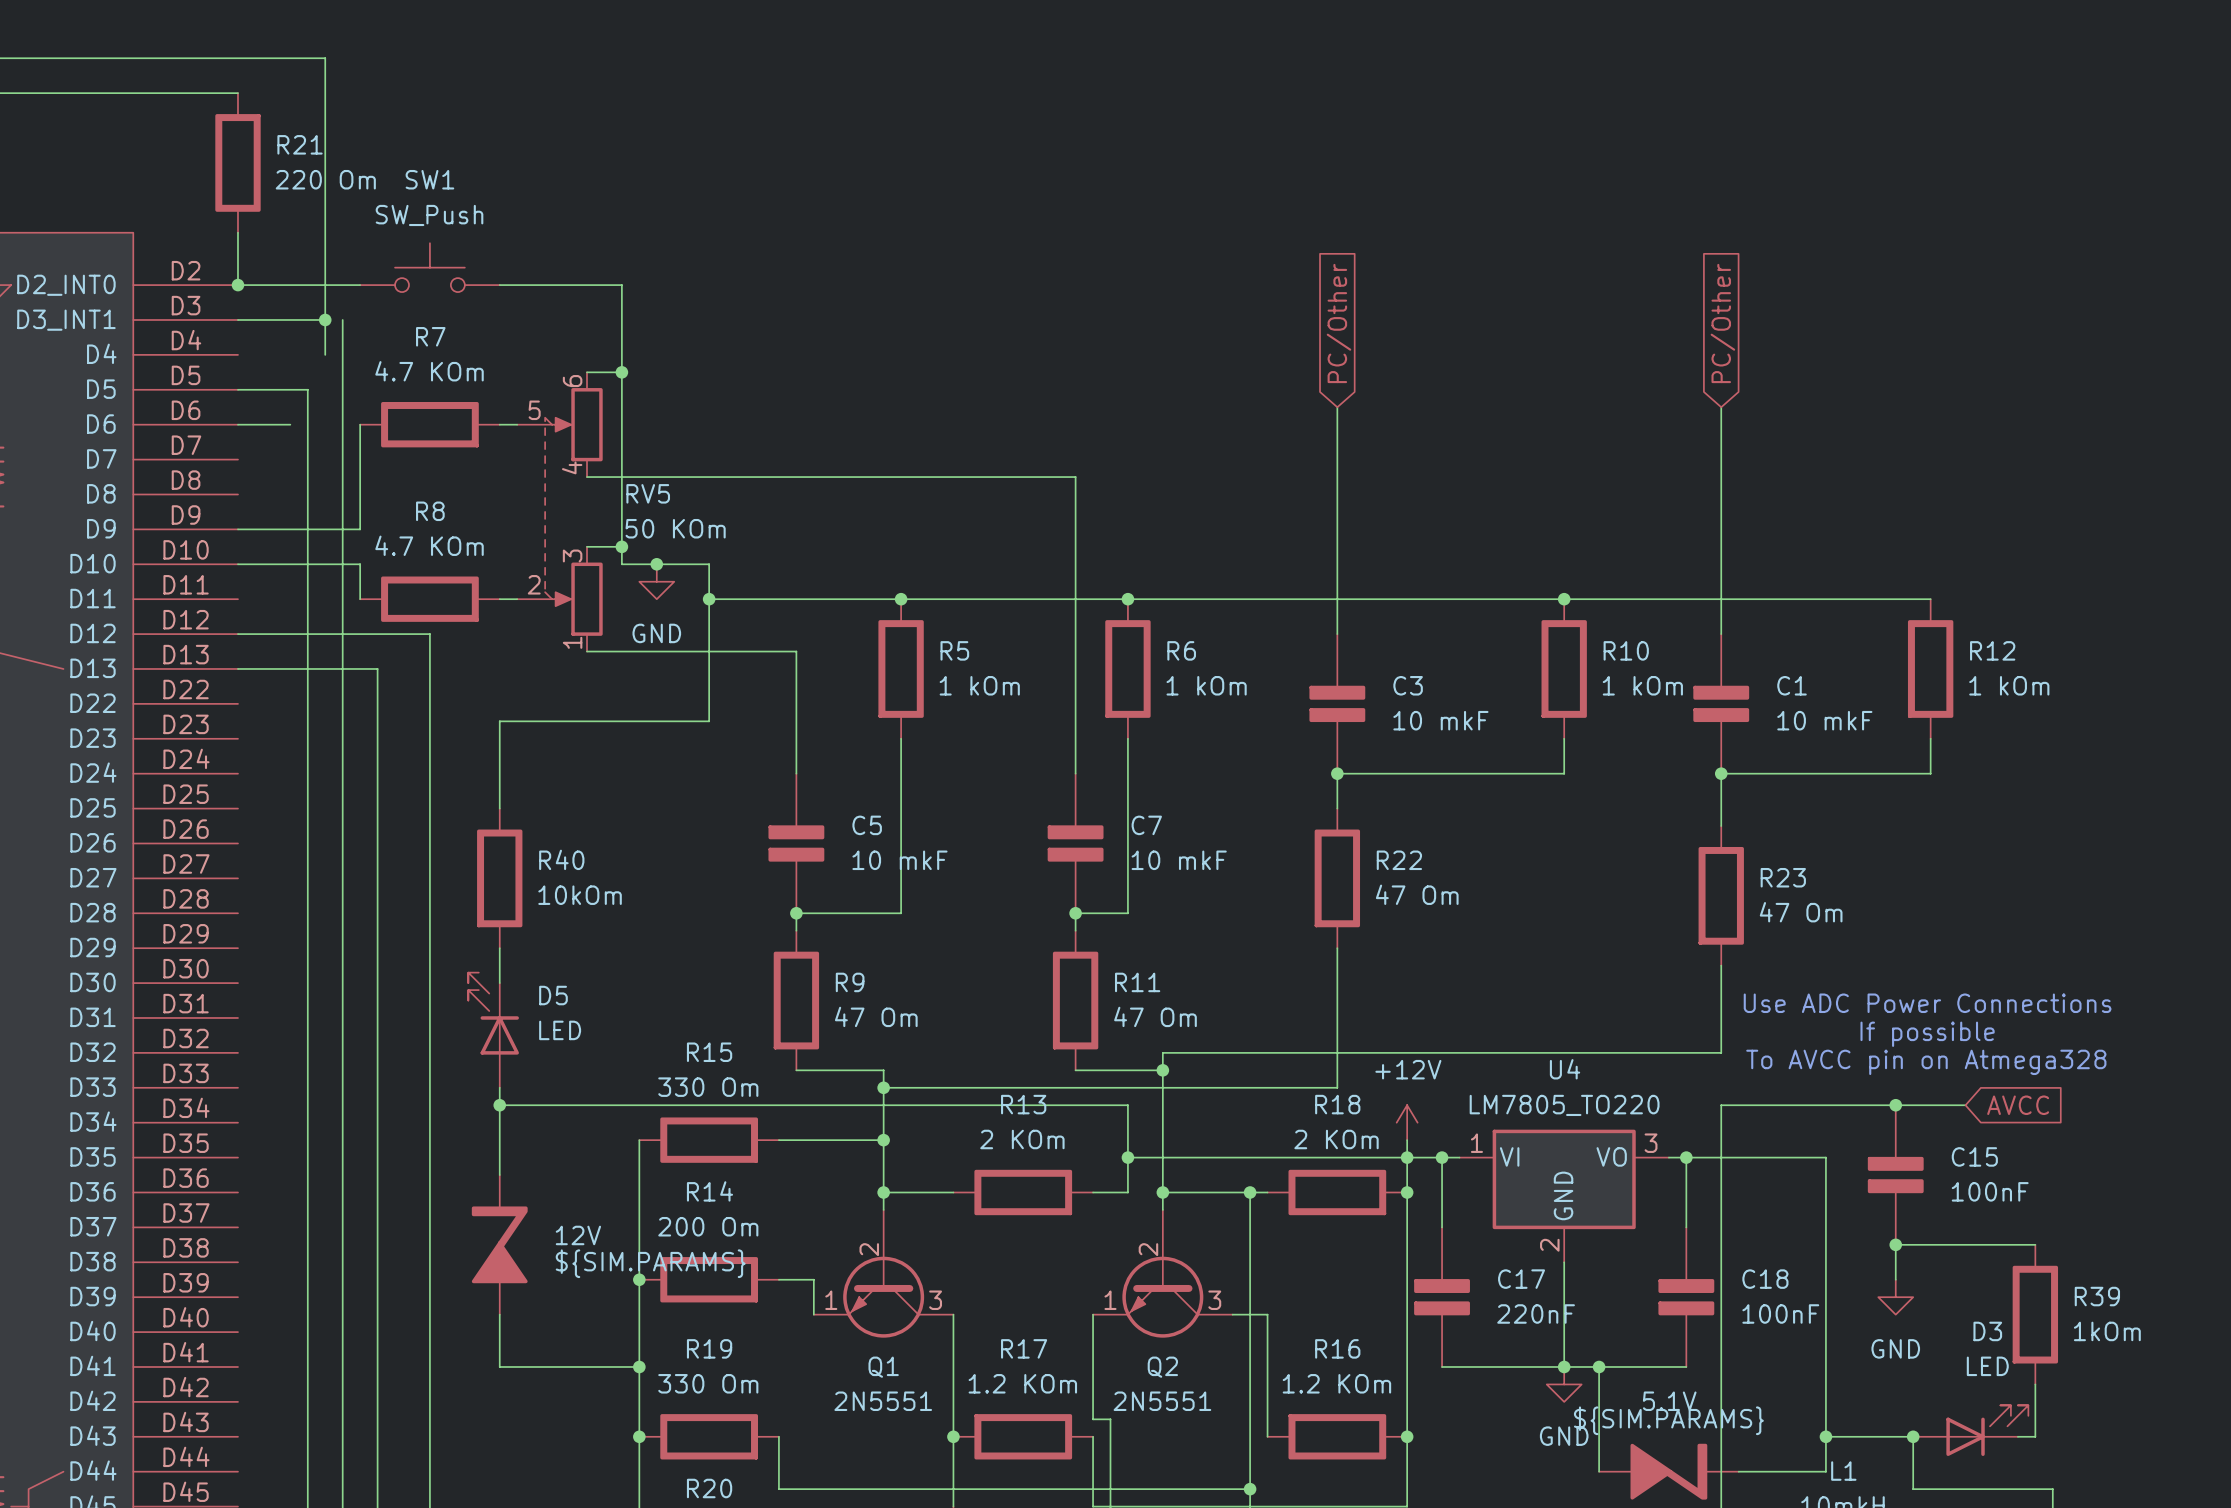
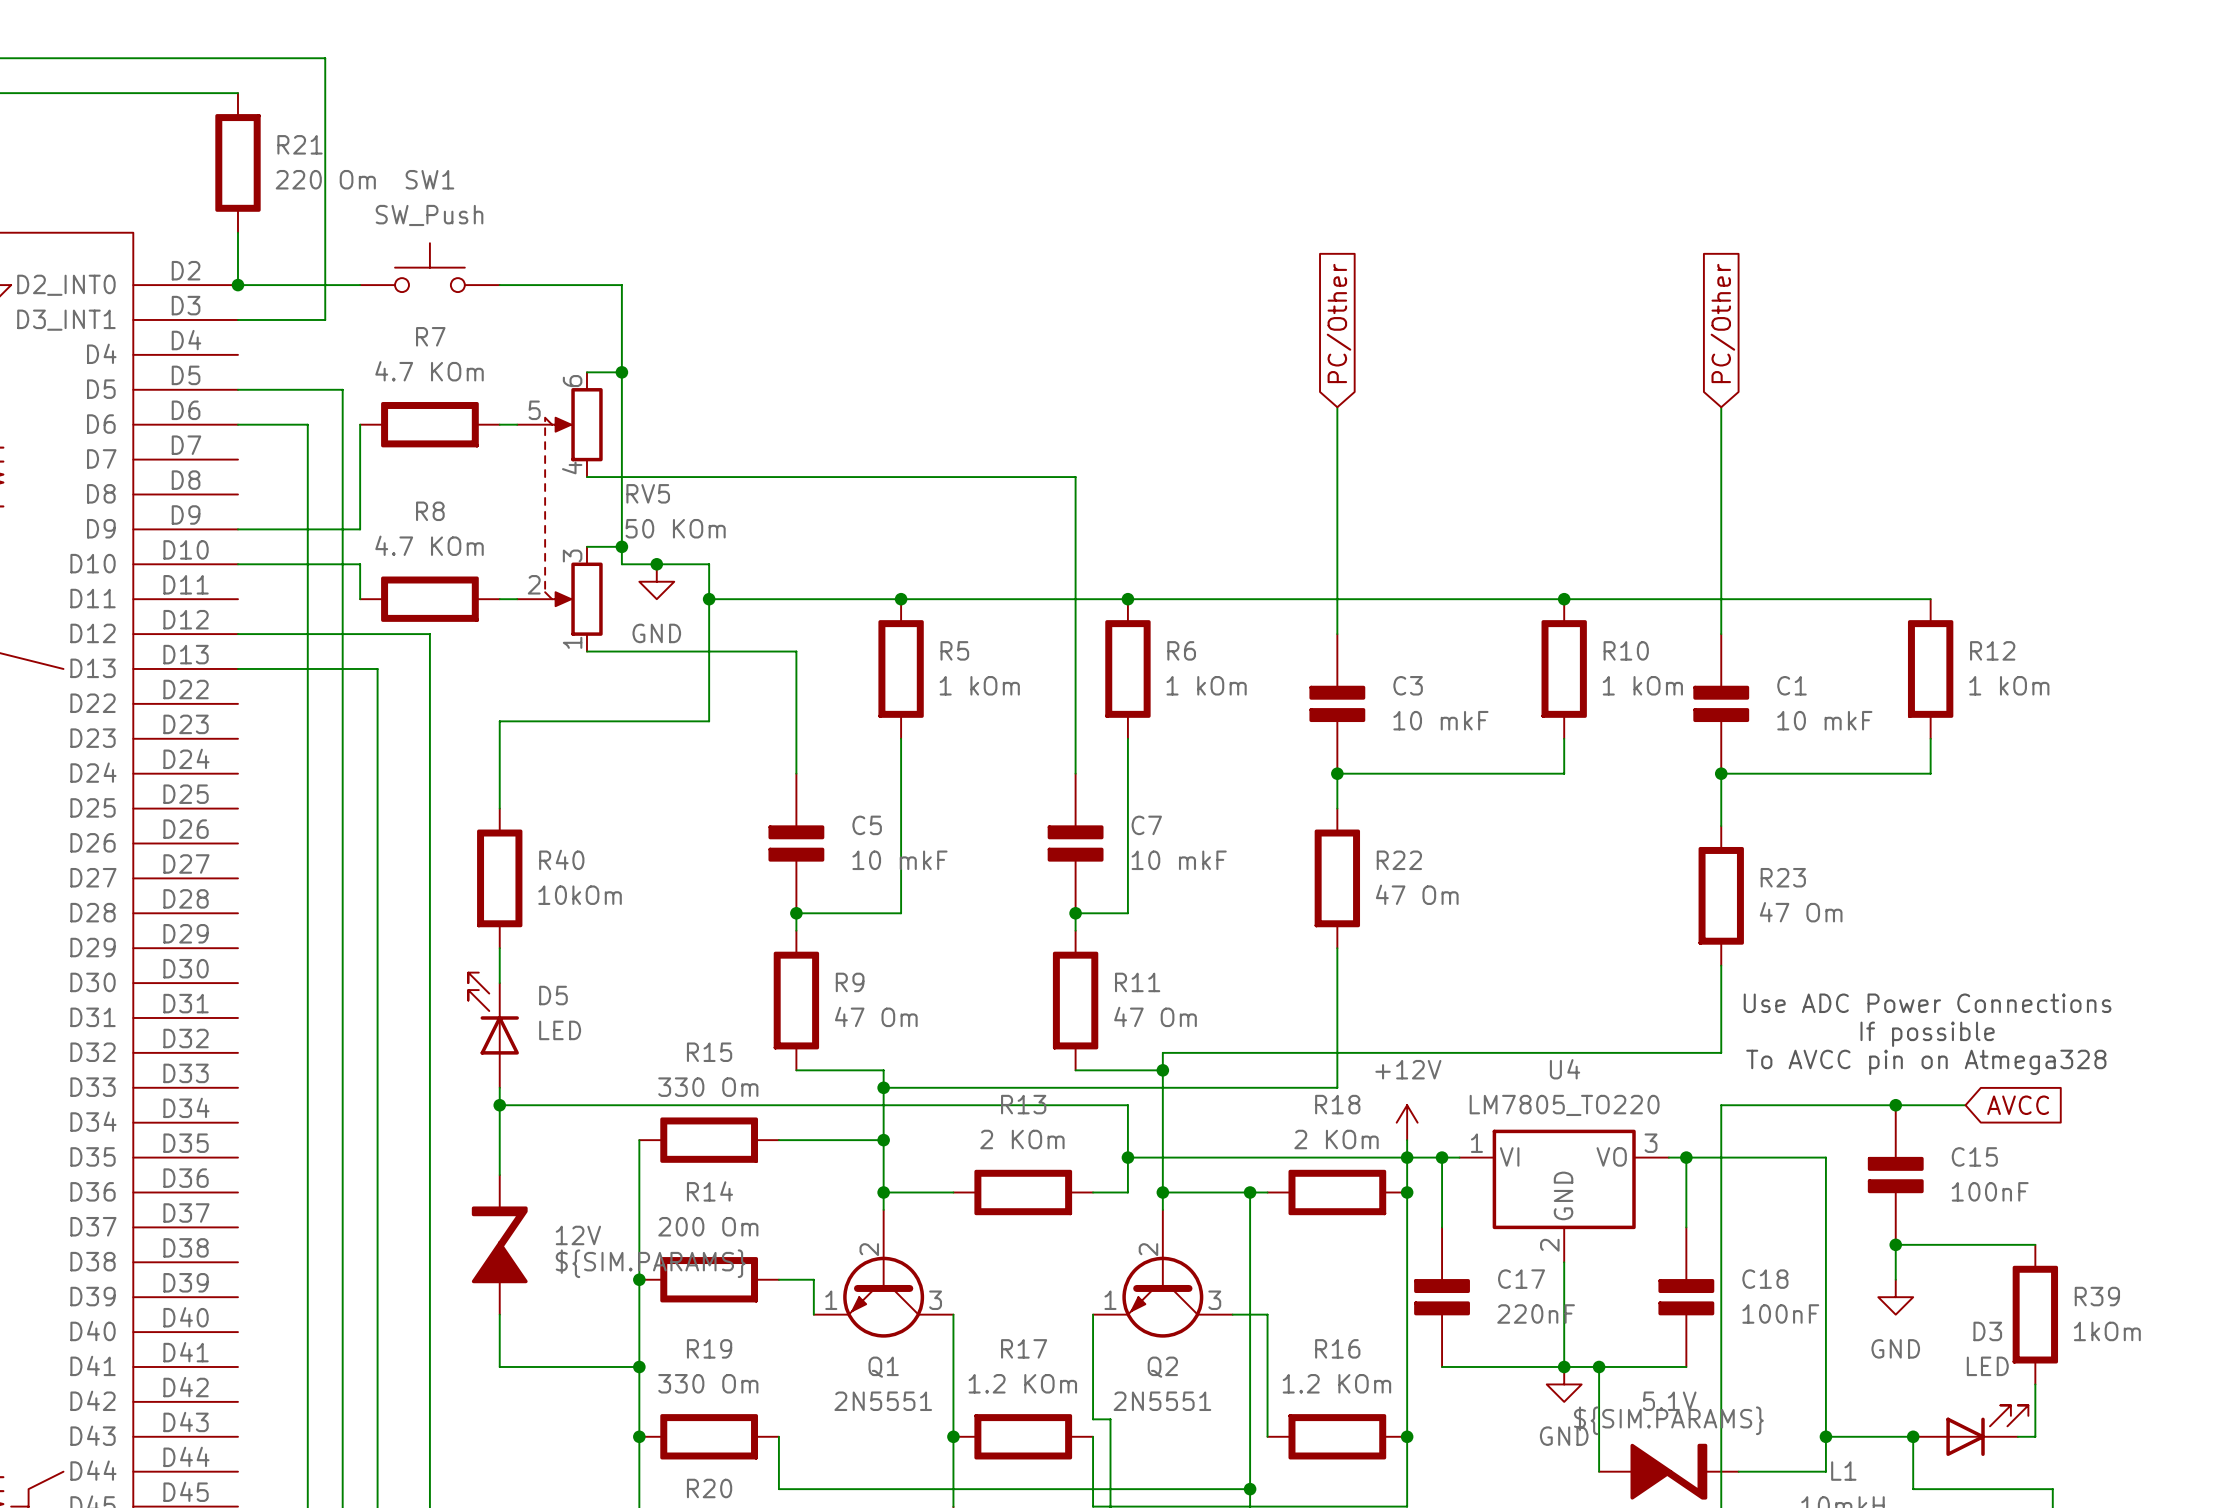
wire: (325, 319) (325, 354) -> none
junction: (325, 319) -> none
wire: (342, 319) (342, 389) -> (307, 389) (342, 389)
wire: (307, 389) (307, 424) -> (290, 424) (307, 424)

